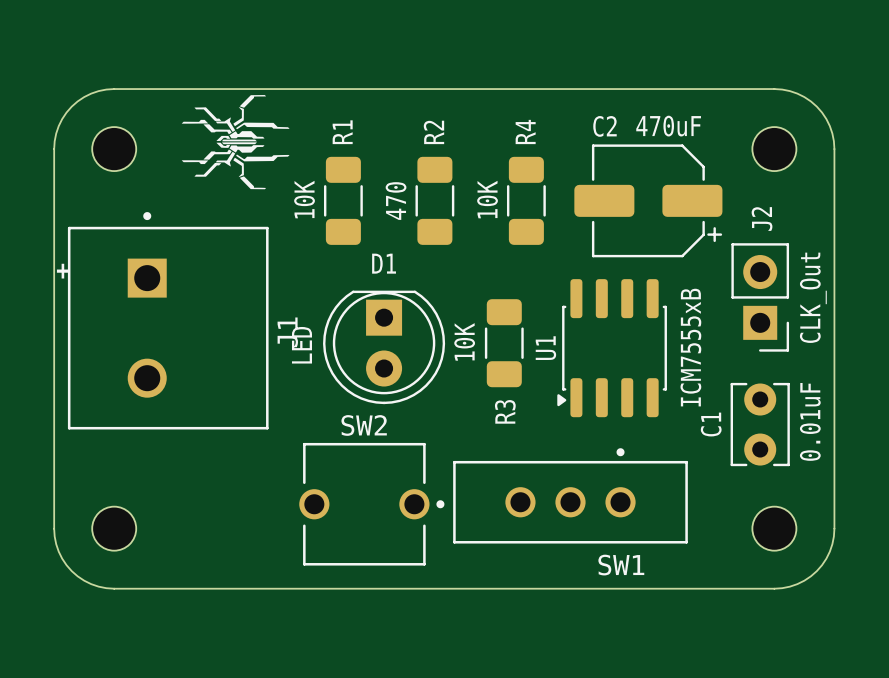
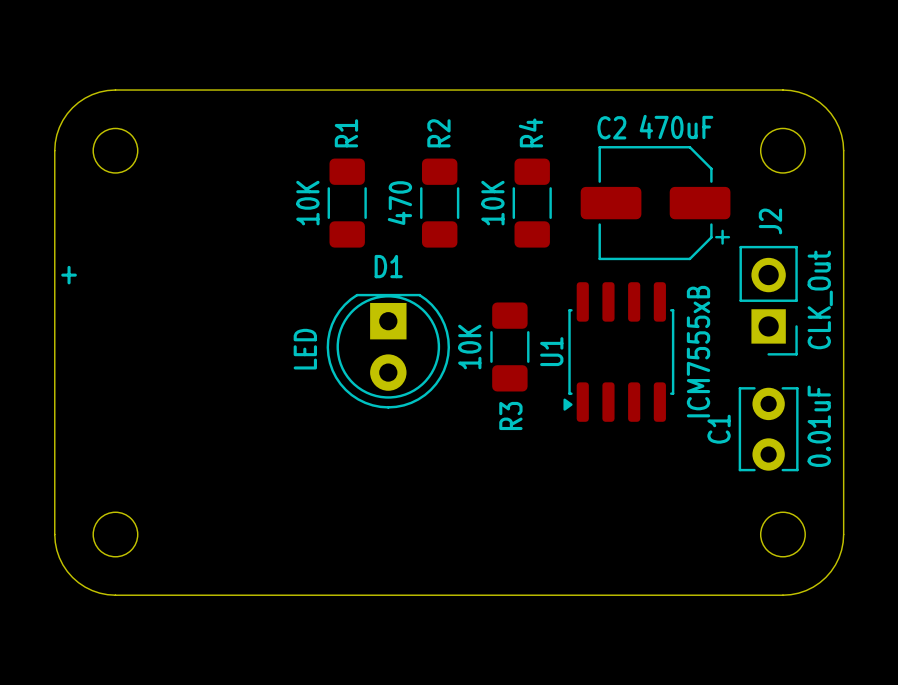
drawing: [181, 95, 290, 190] -> none
J1: (168, 320) -> none
SW1: (570, 495) -> none
SW2: (371, 504) -> none

